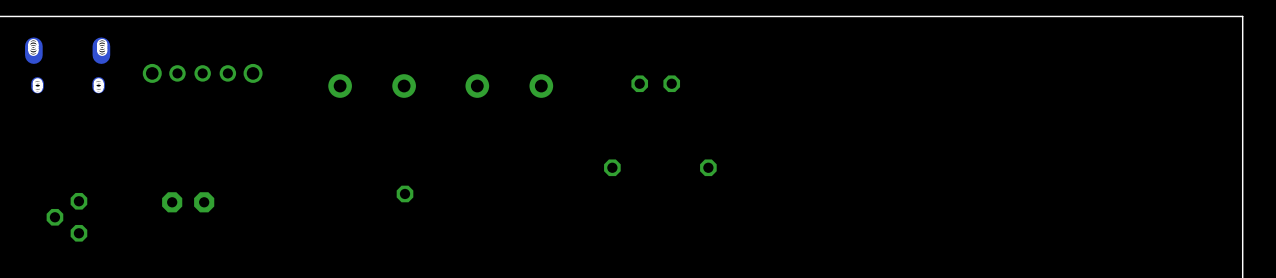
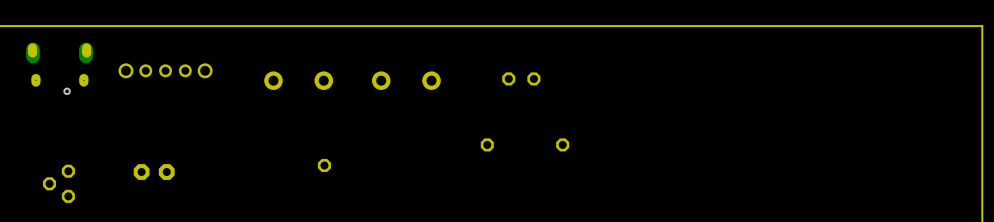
via: none -> (67, 91)

